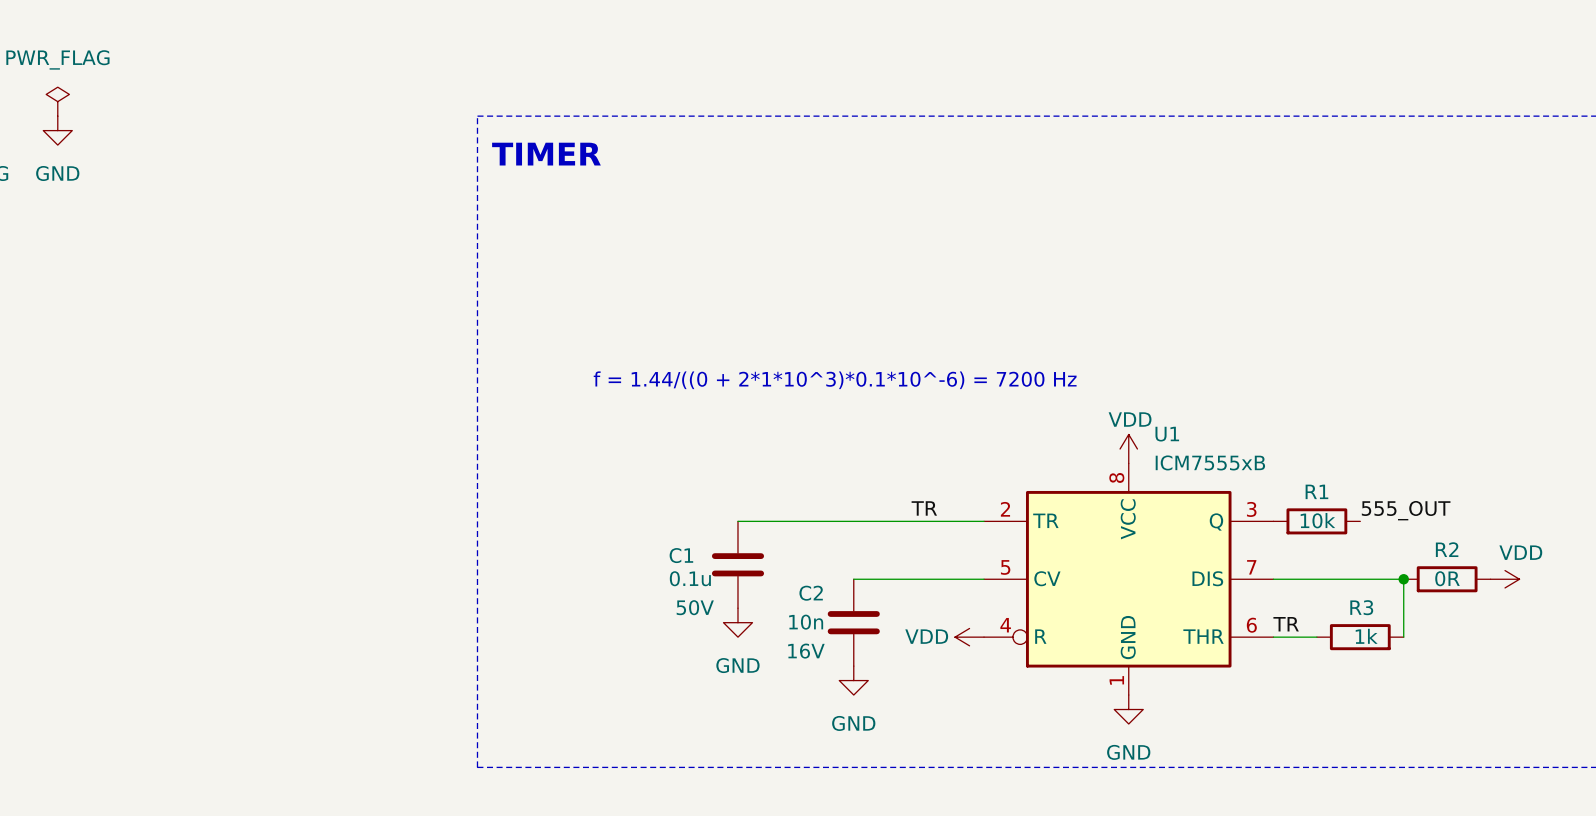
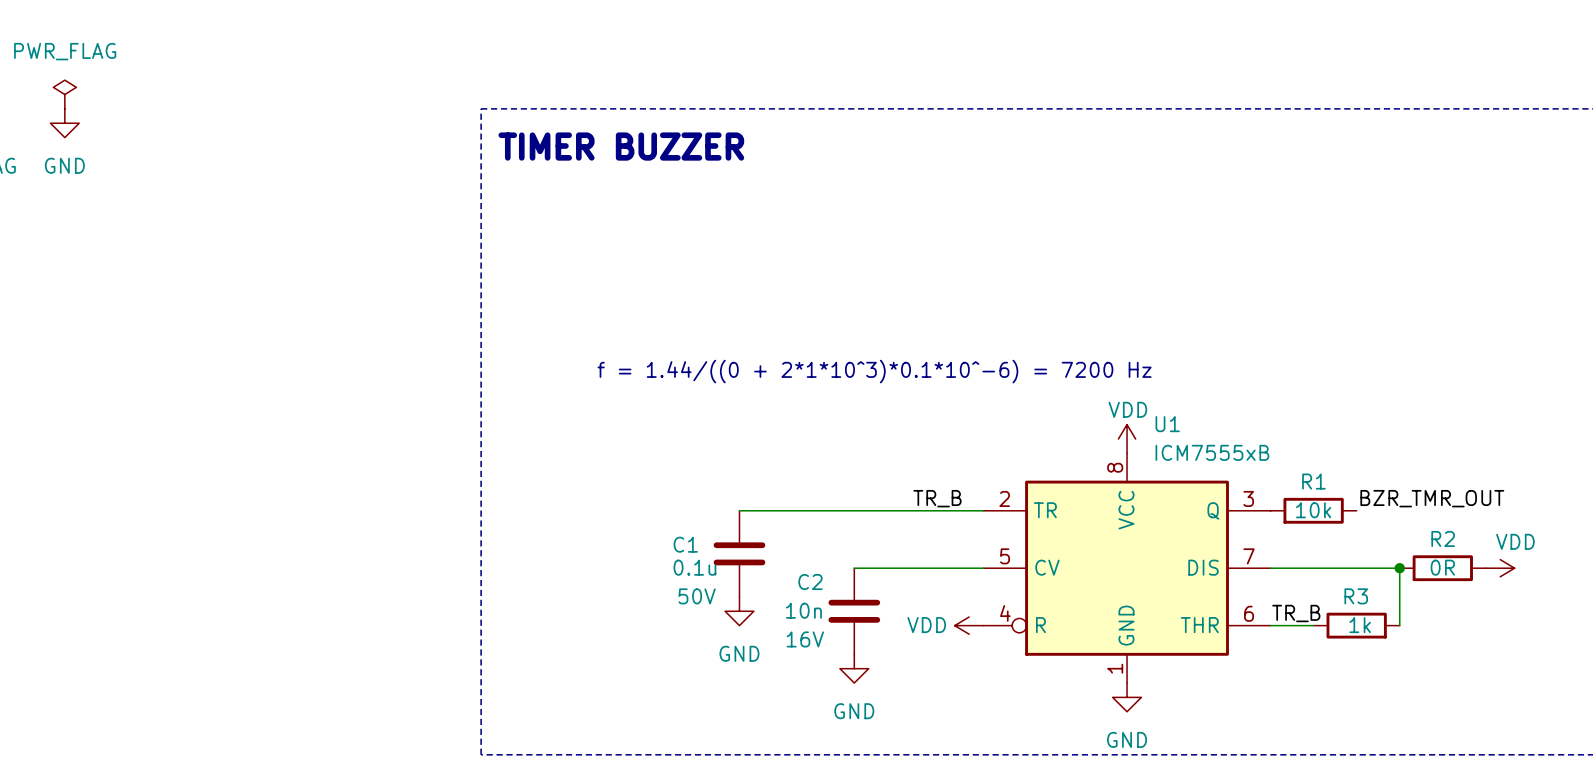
text: TIMER (546, 154) -> TIMER BUZZER (621, 146)
label: TR (924, 508) -> TR_B (937, 498)
label: 555_OUT (1406, 510) -> BZR_TMR_OUT (1432, 498)
label: TR (1286, 624) -> TR_B (1296, 613)

